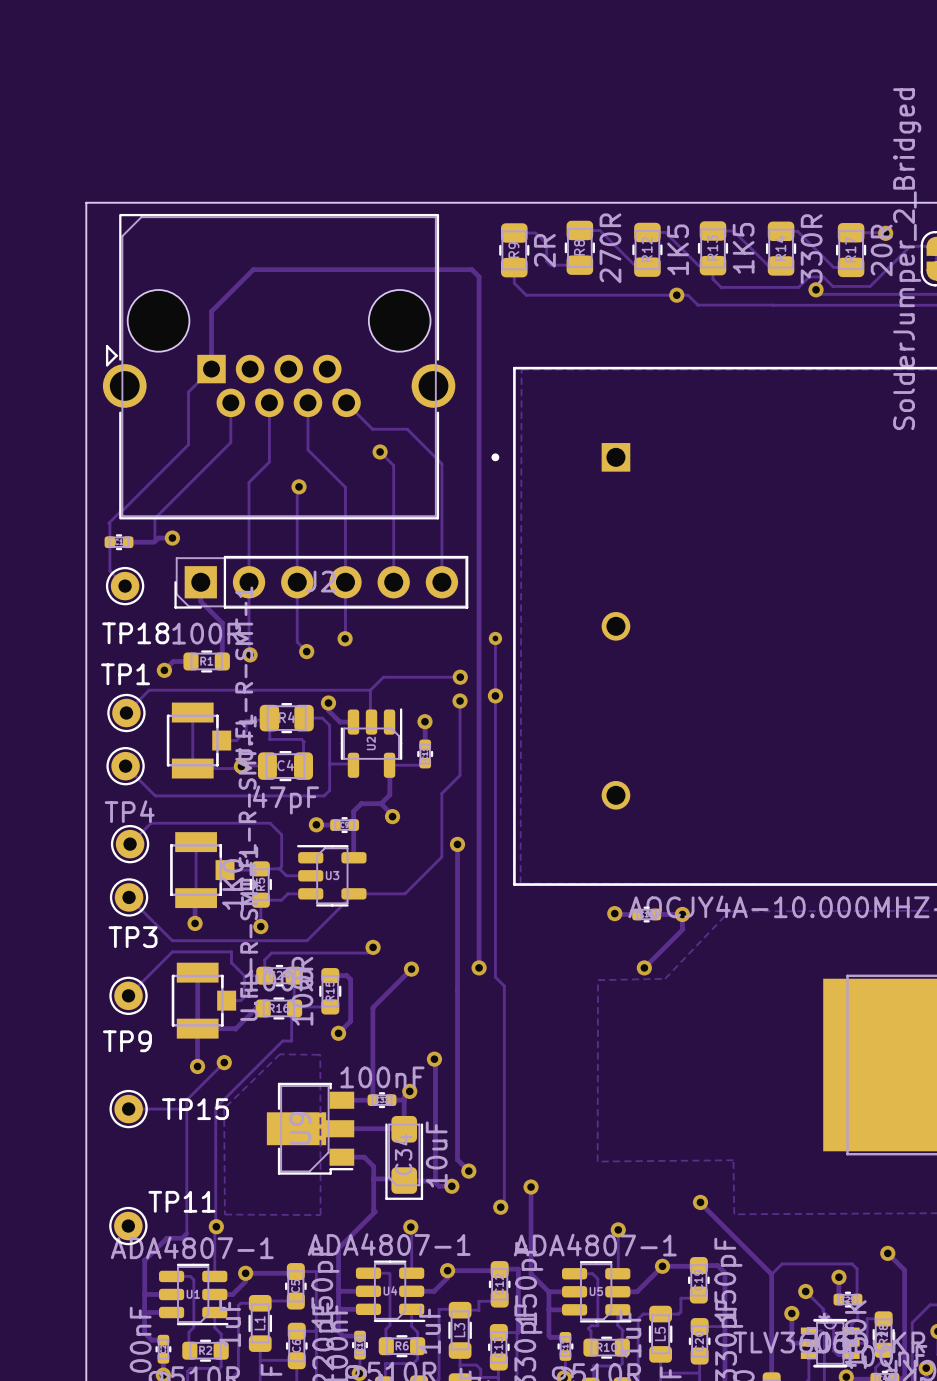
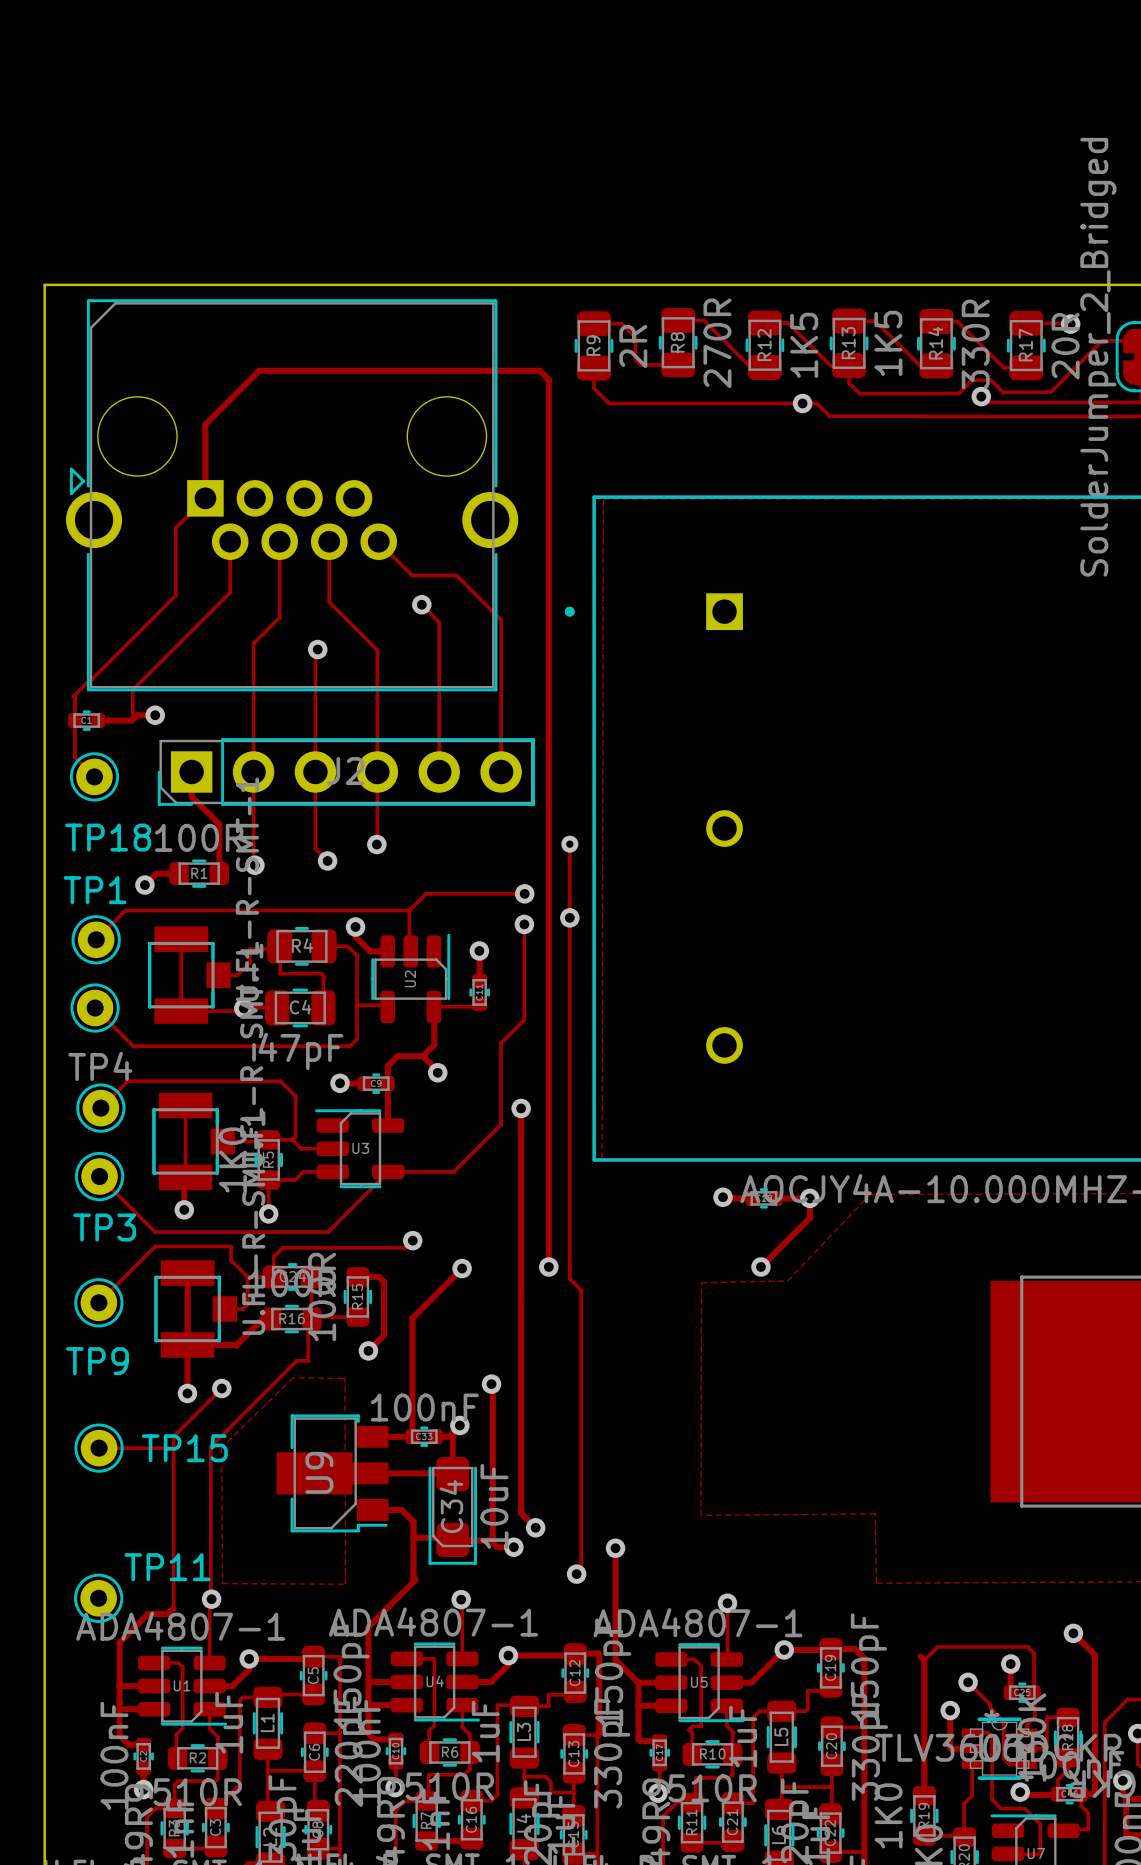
track: (700, 1202) (768, 1271) -> none
via: (700, 1202) -> none

